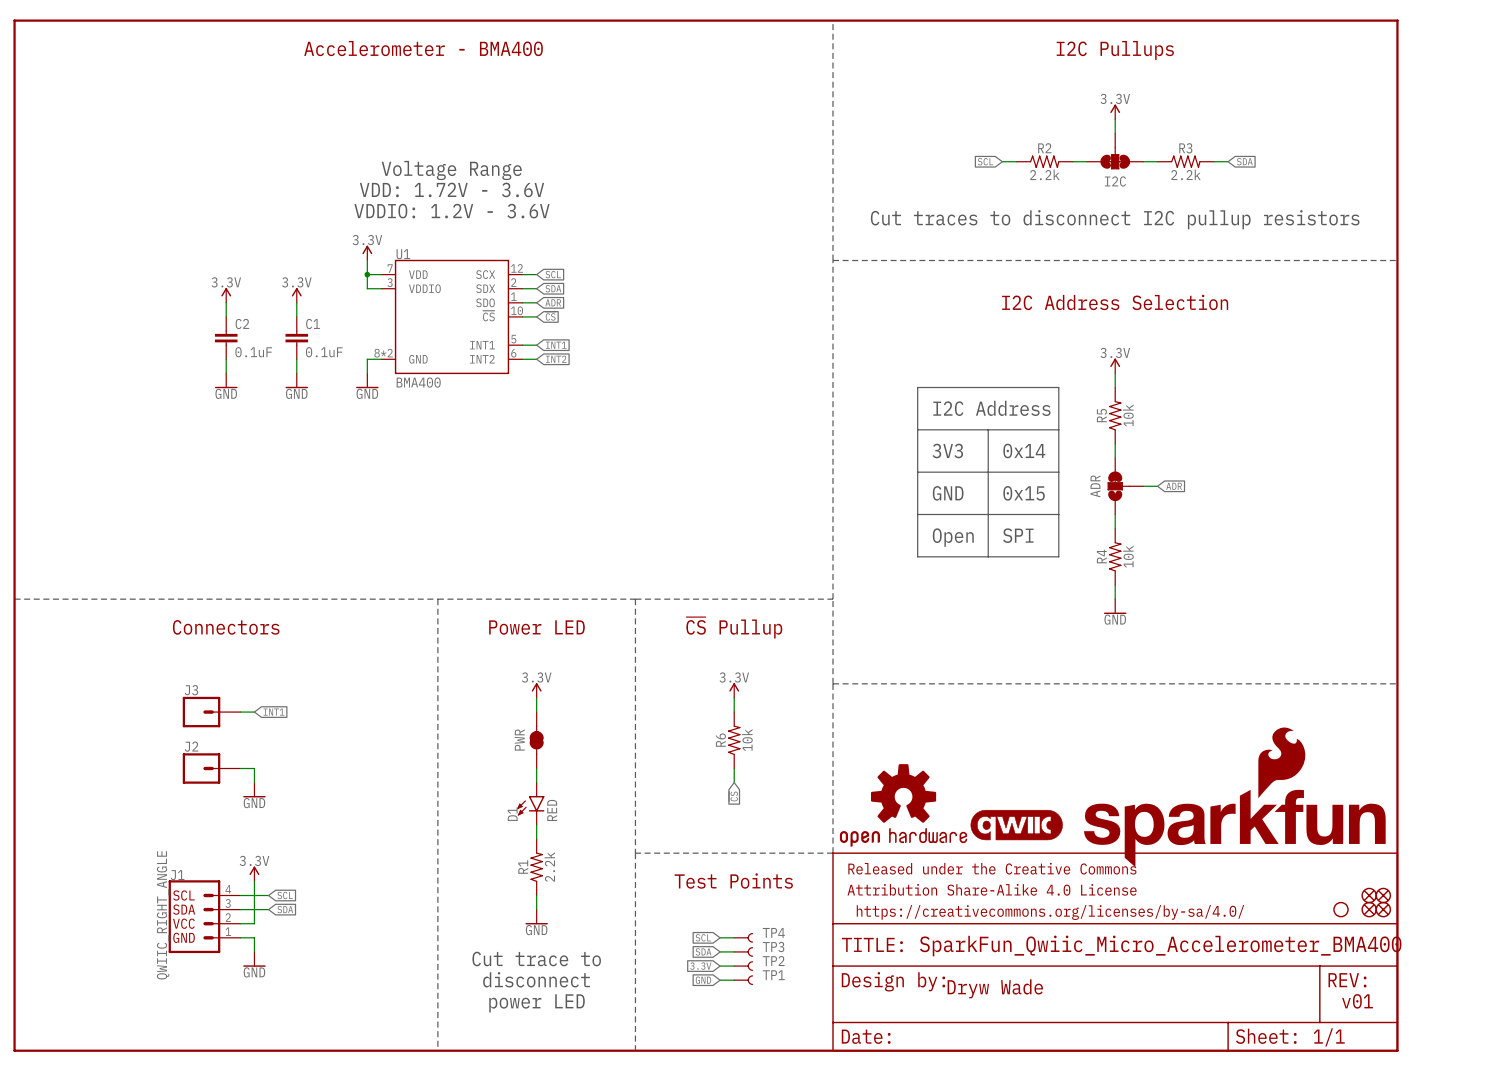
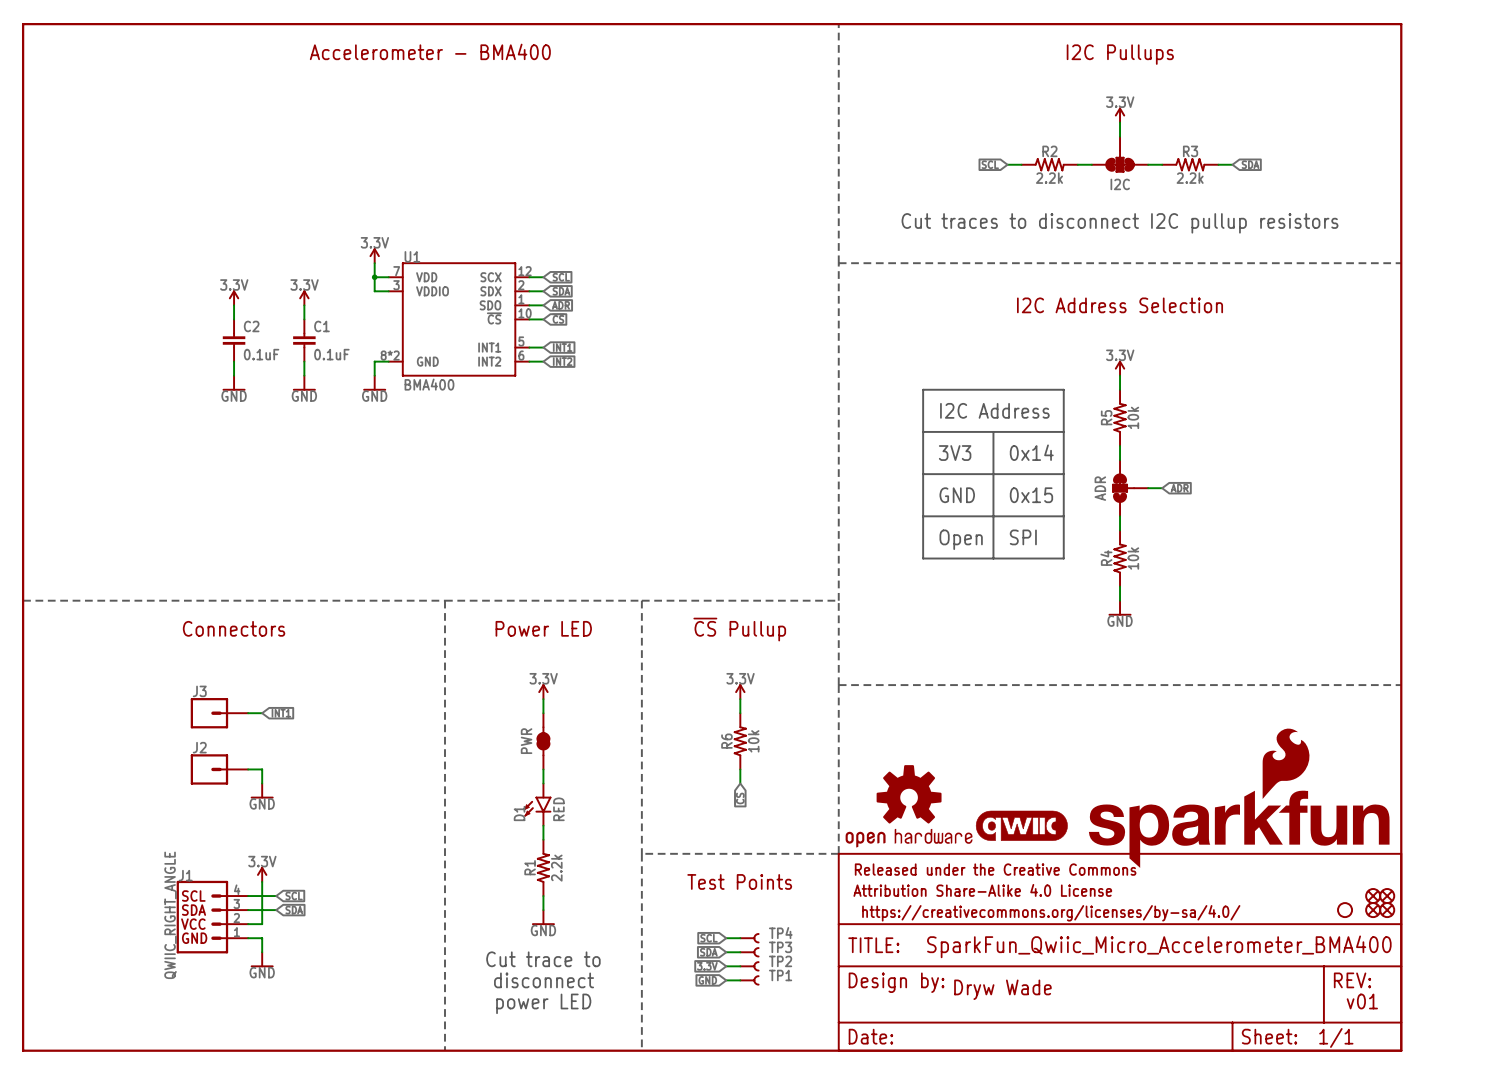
text: Voltage Range (451, 170) -> none
text: VDD: 1.72V - 3.6V (452, 189) -> none
text: VDDIO: 1.2V - 3.6V (452, 211) -> none

